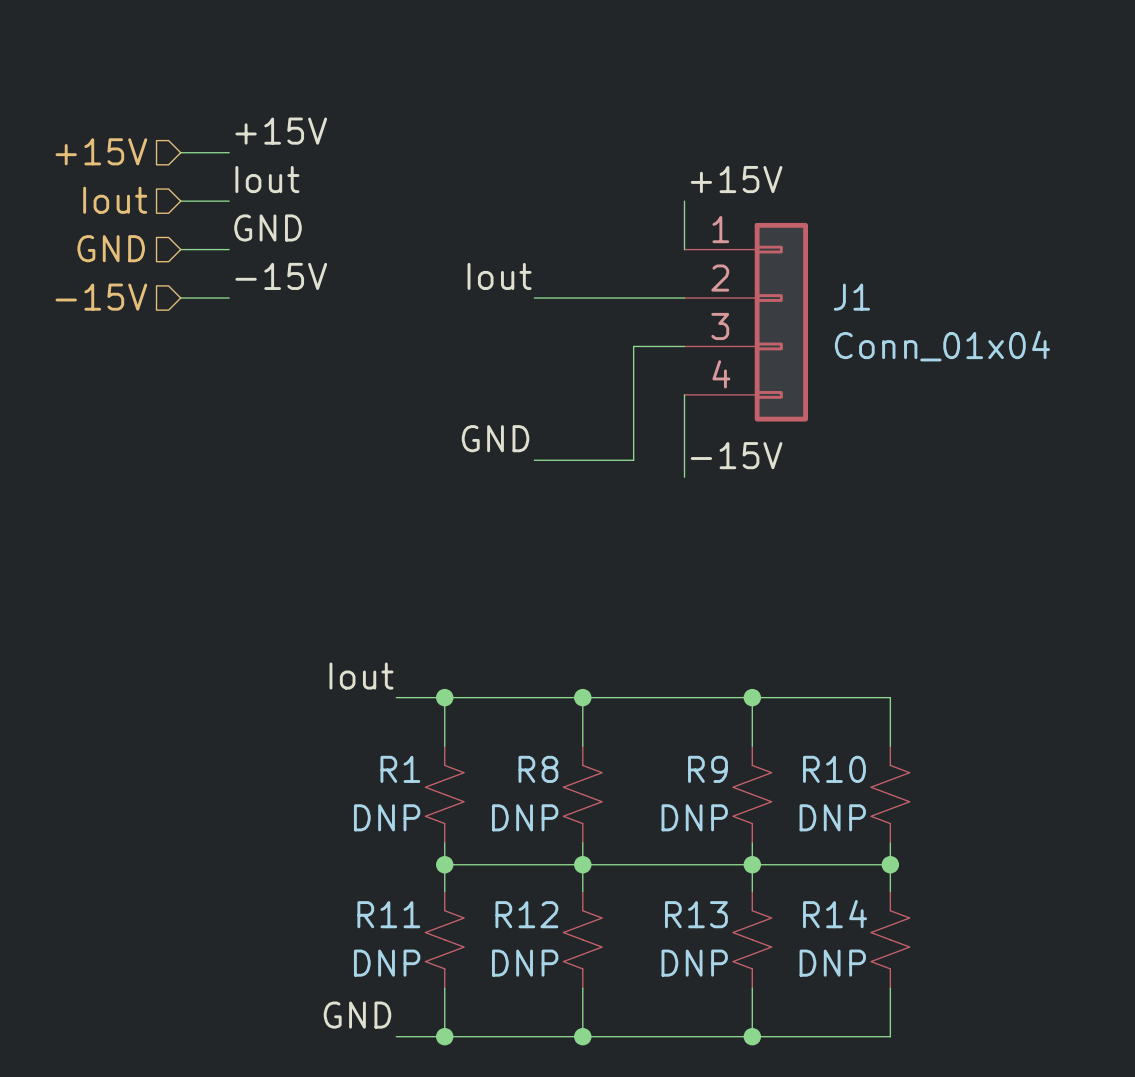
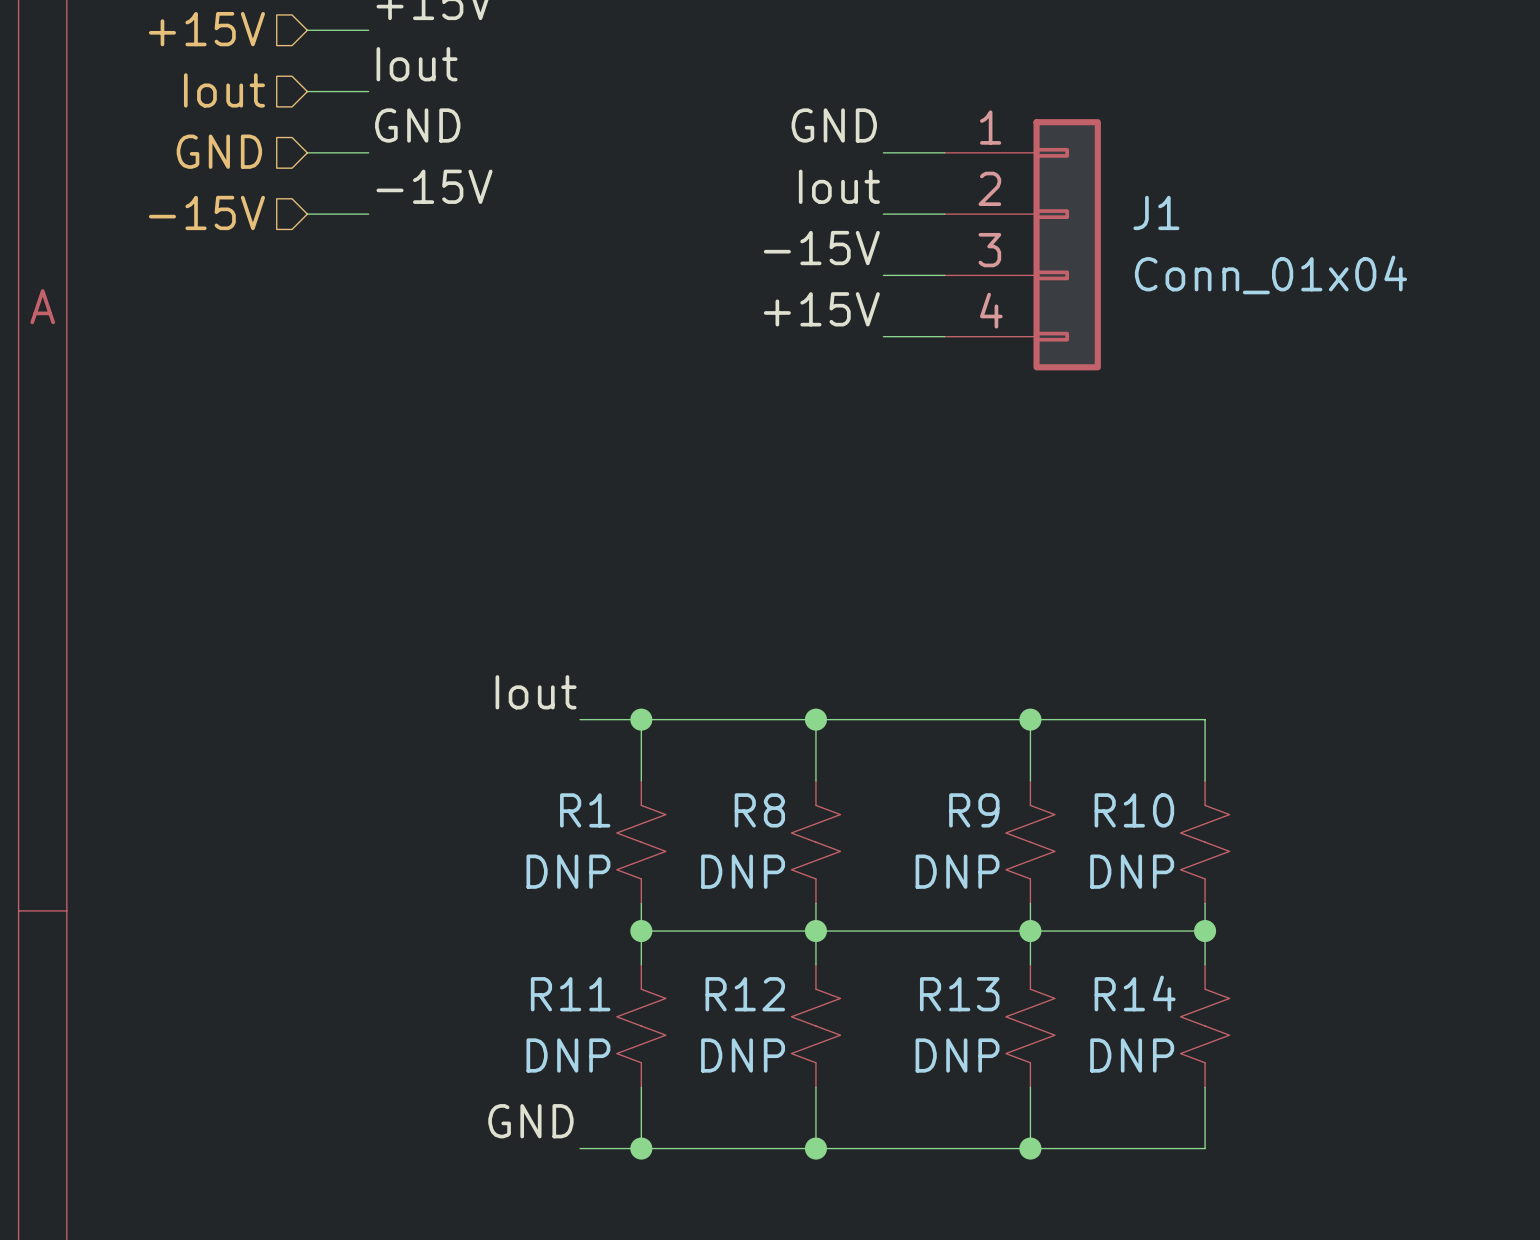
label position: +15V (736, 179) -> +15V (821, 309)
wire: (684, 201) (684, 249) -> (883, 152) (944, 152)
label position: Iout (499, 276) -> Iout (839, 186)
wire: (534, 298) (636, 298) -> none
wire: (636, 346) (633, 346) (633, 460) (534, 460) -> none
wire: (684, 394) (684, 477) -> (944, 336) (883, 336)
label position: GND (495, 438) -> GND (834, 125)
label position: -15V (736, 455) -> -15V (821, 248)

